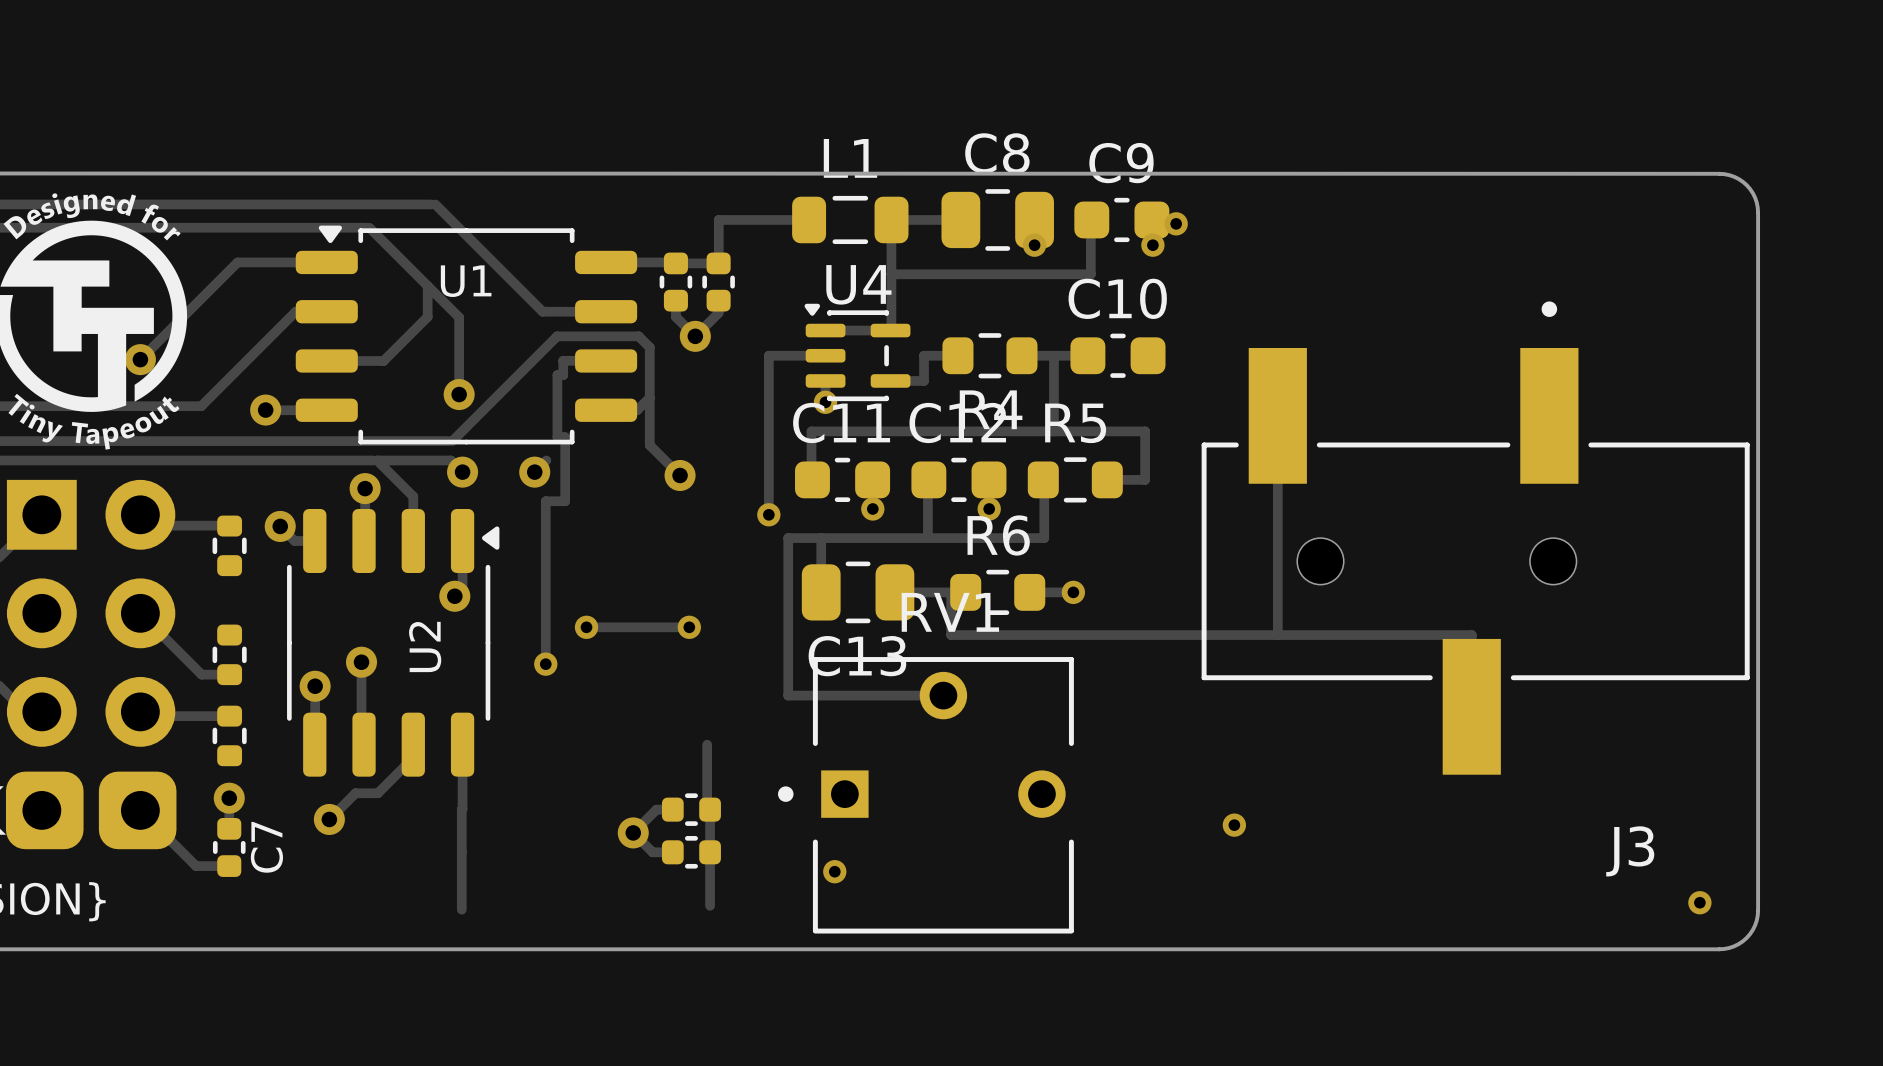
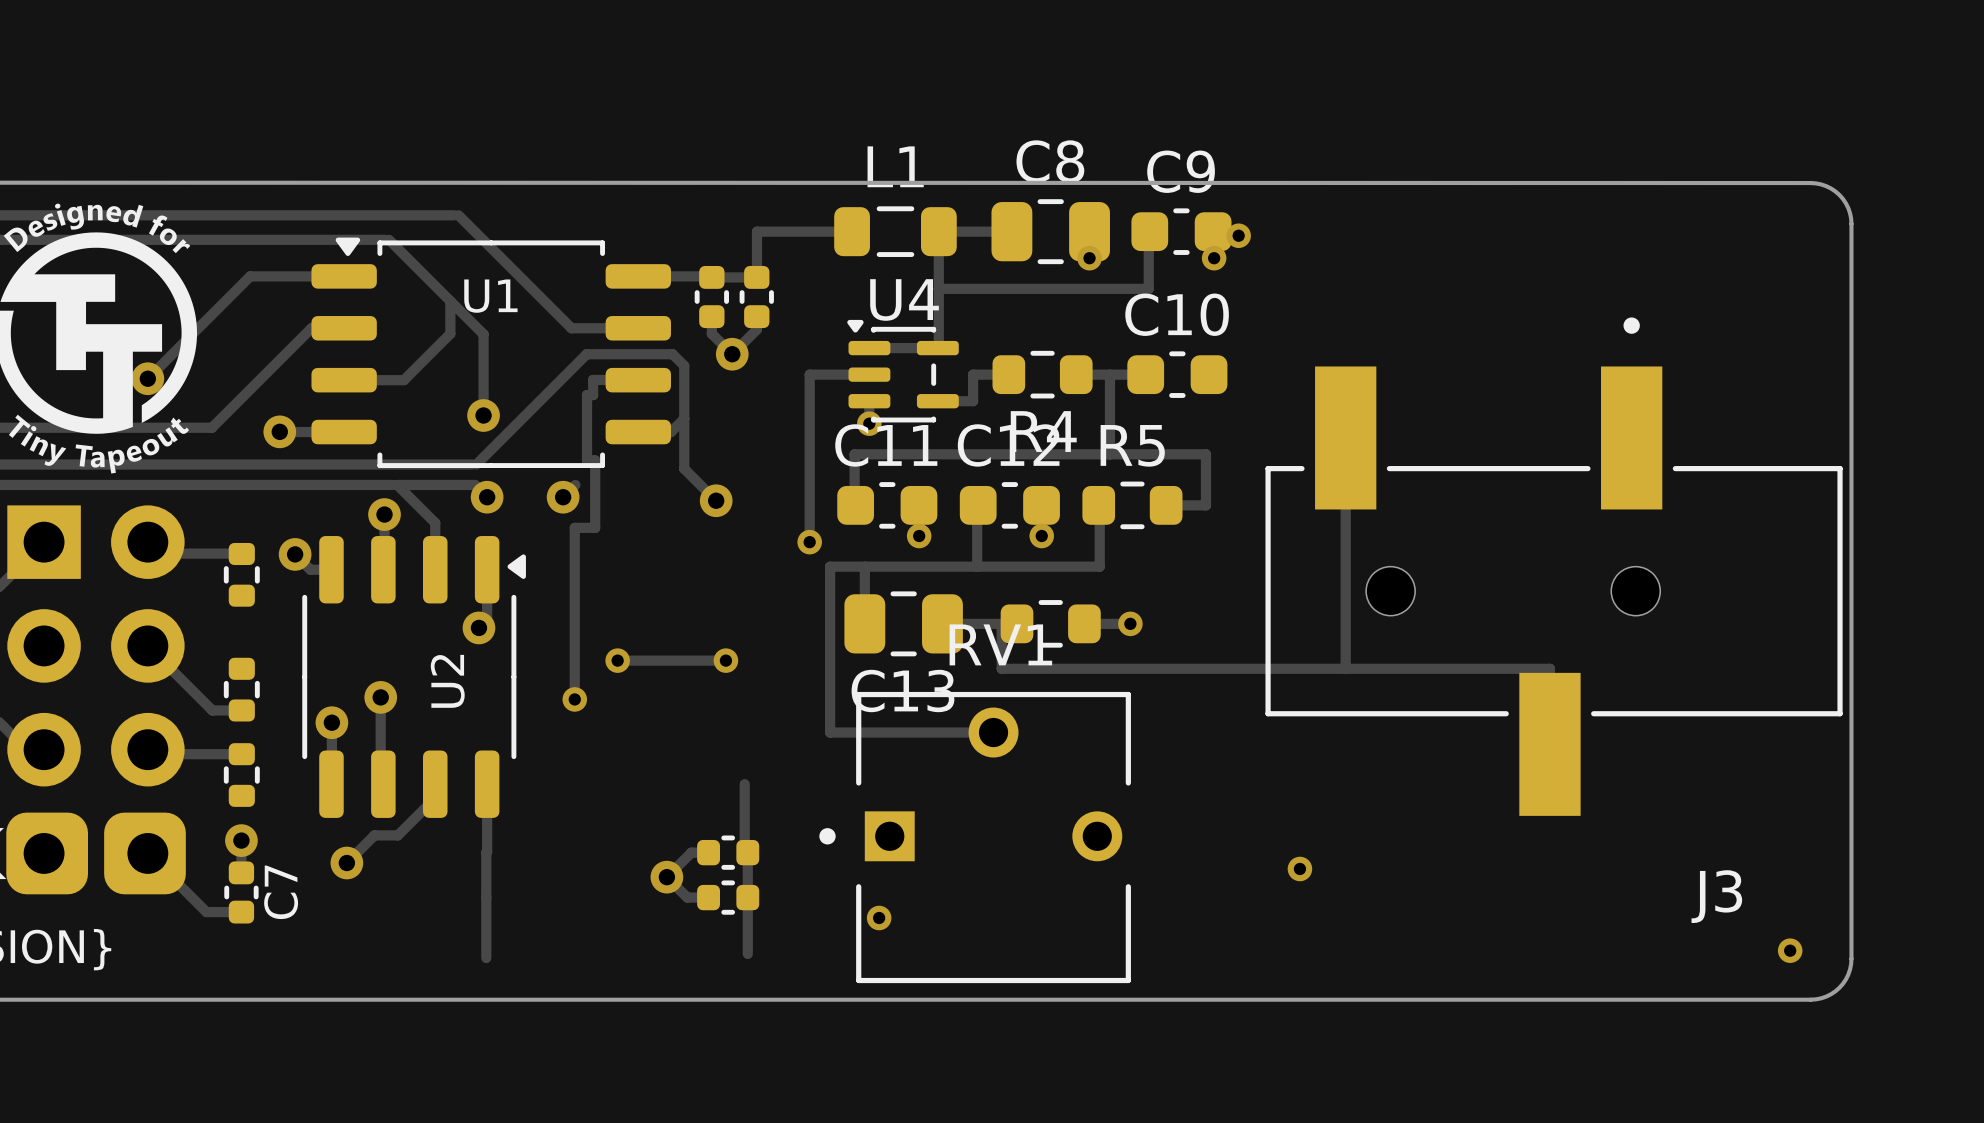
R6 name: R6 (998, 535) -> none

